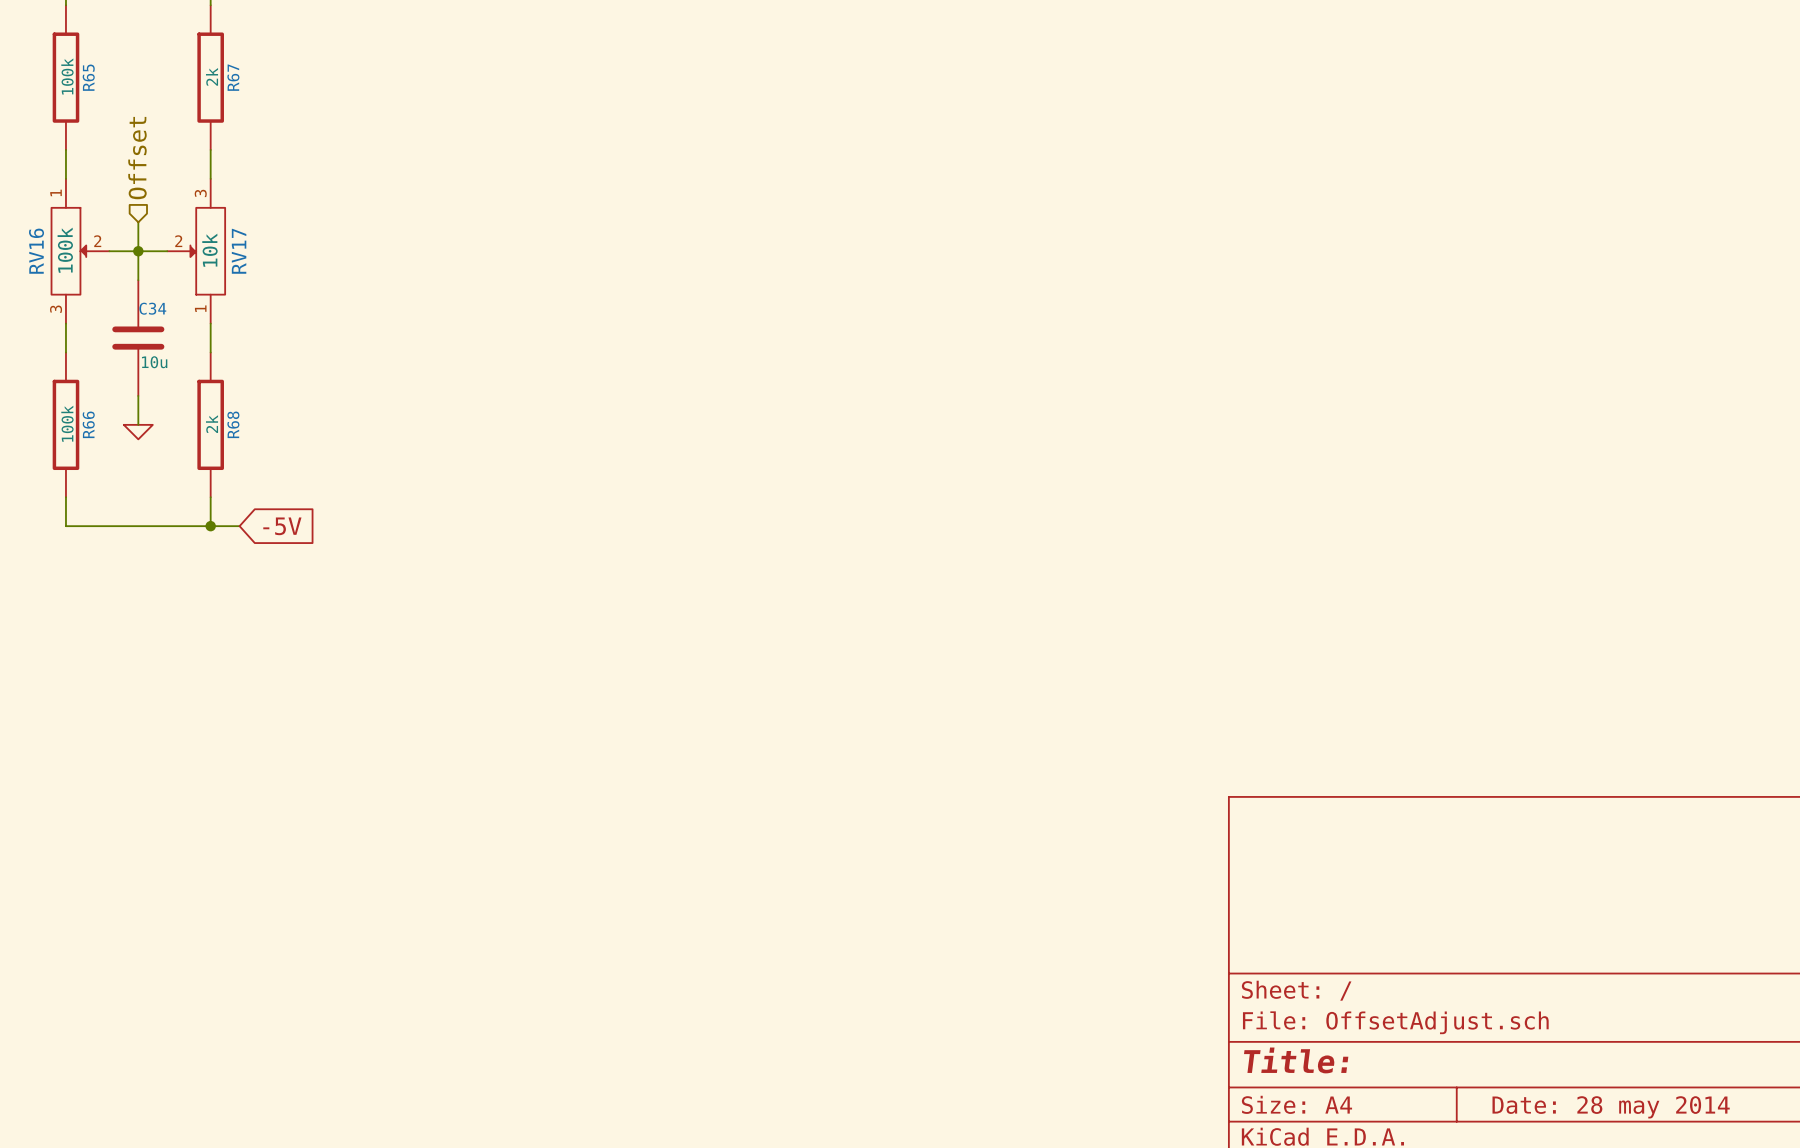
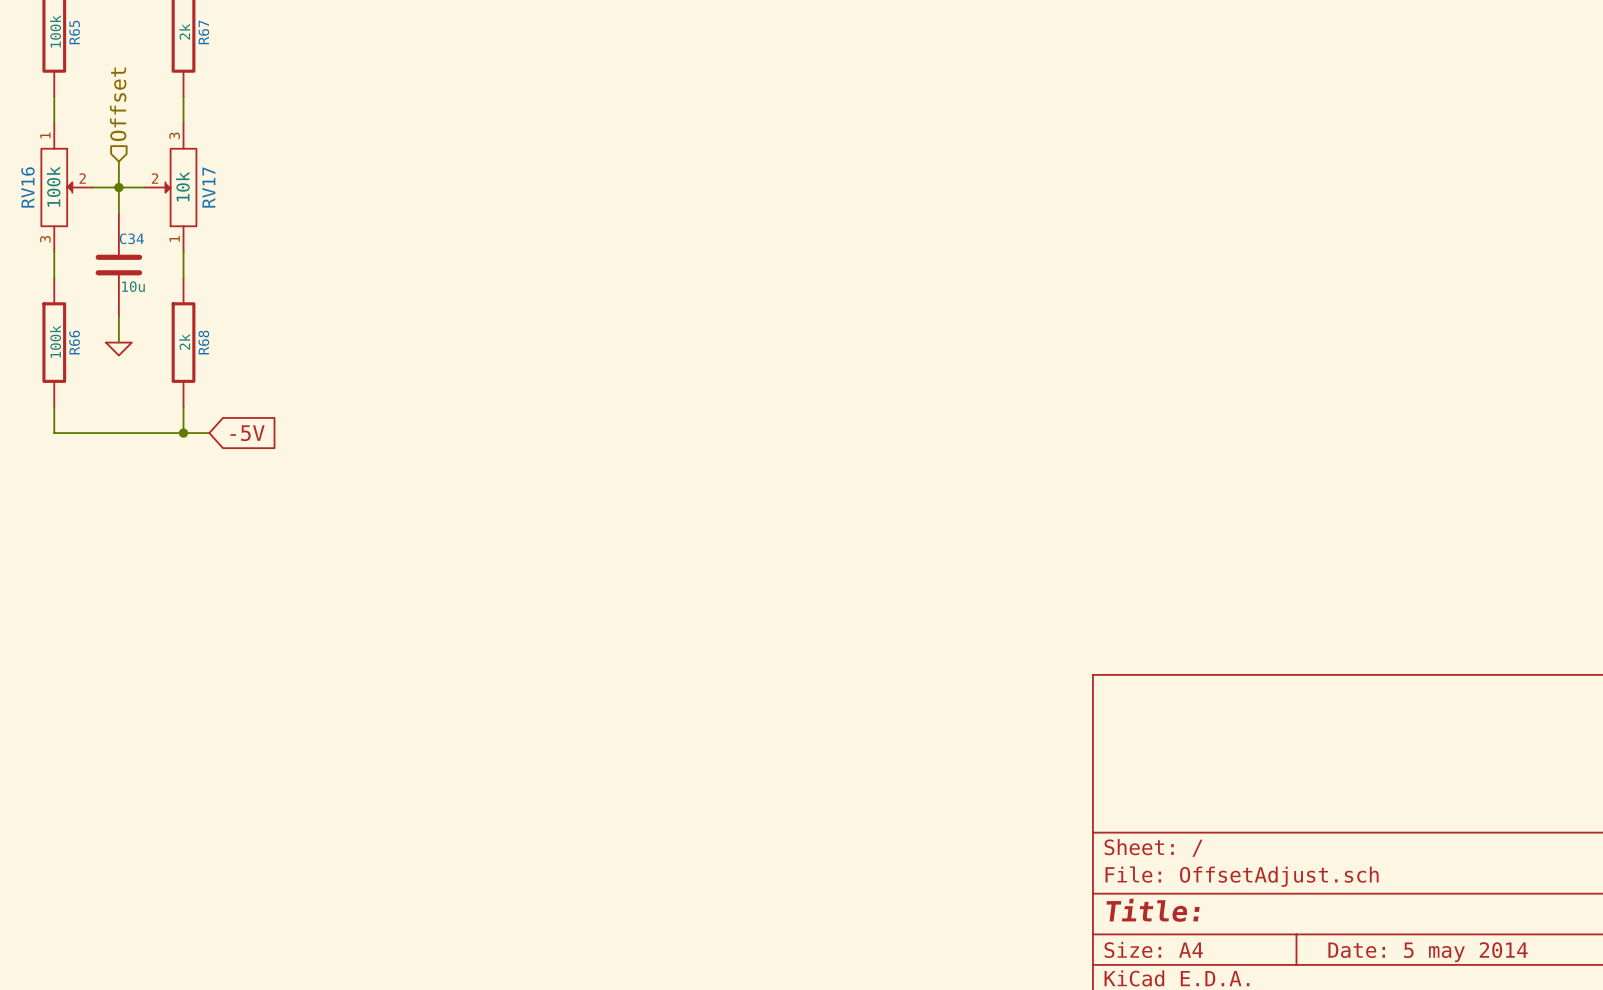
title block: Date: 28 may 2014 (1611, 1107) -> Date: 5 may 2014 (1428, 952)

